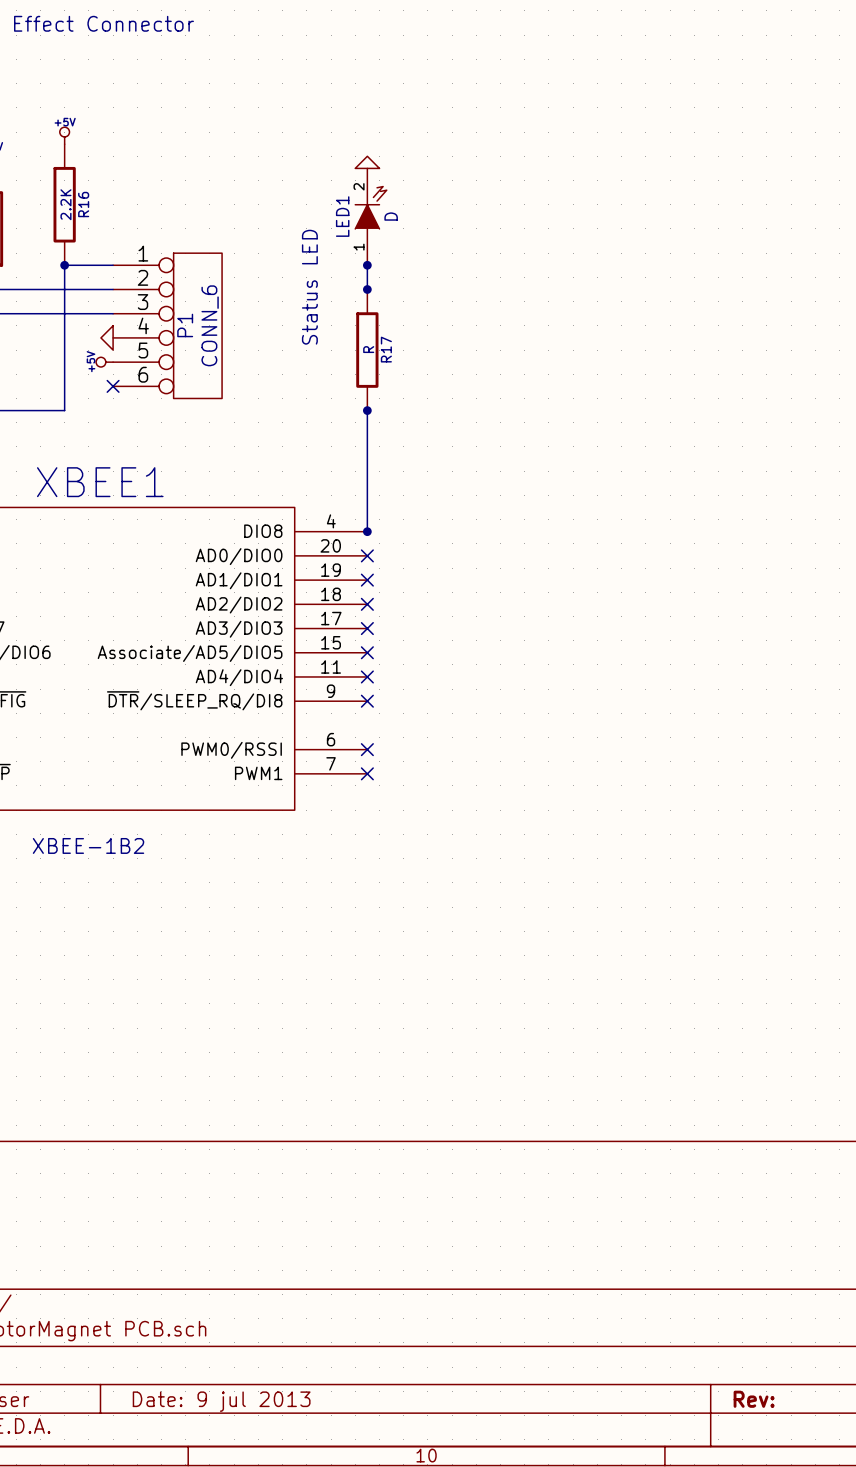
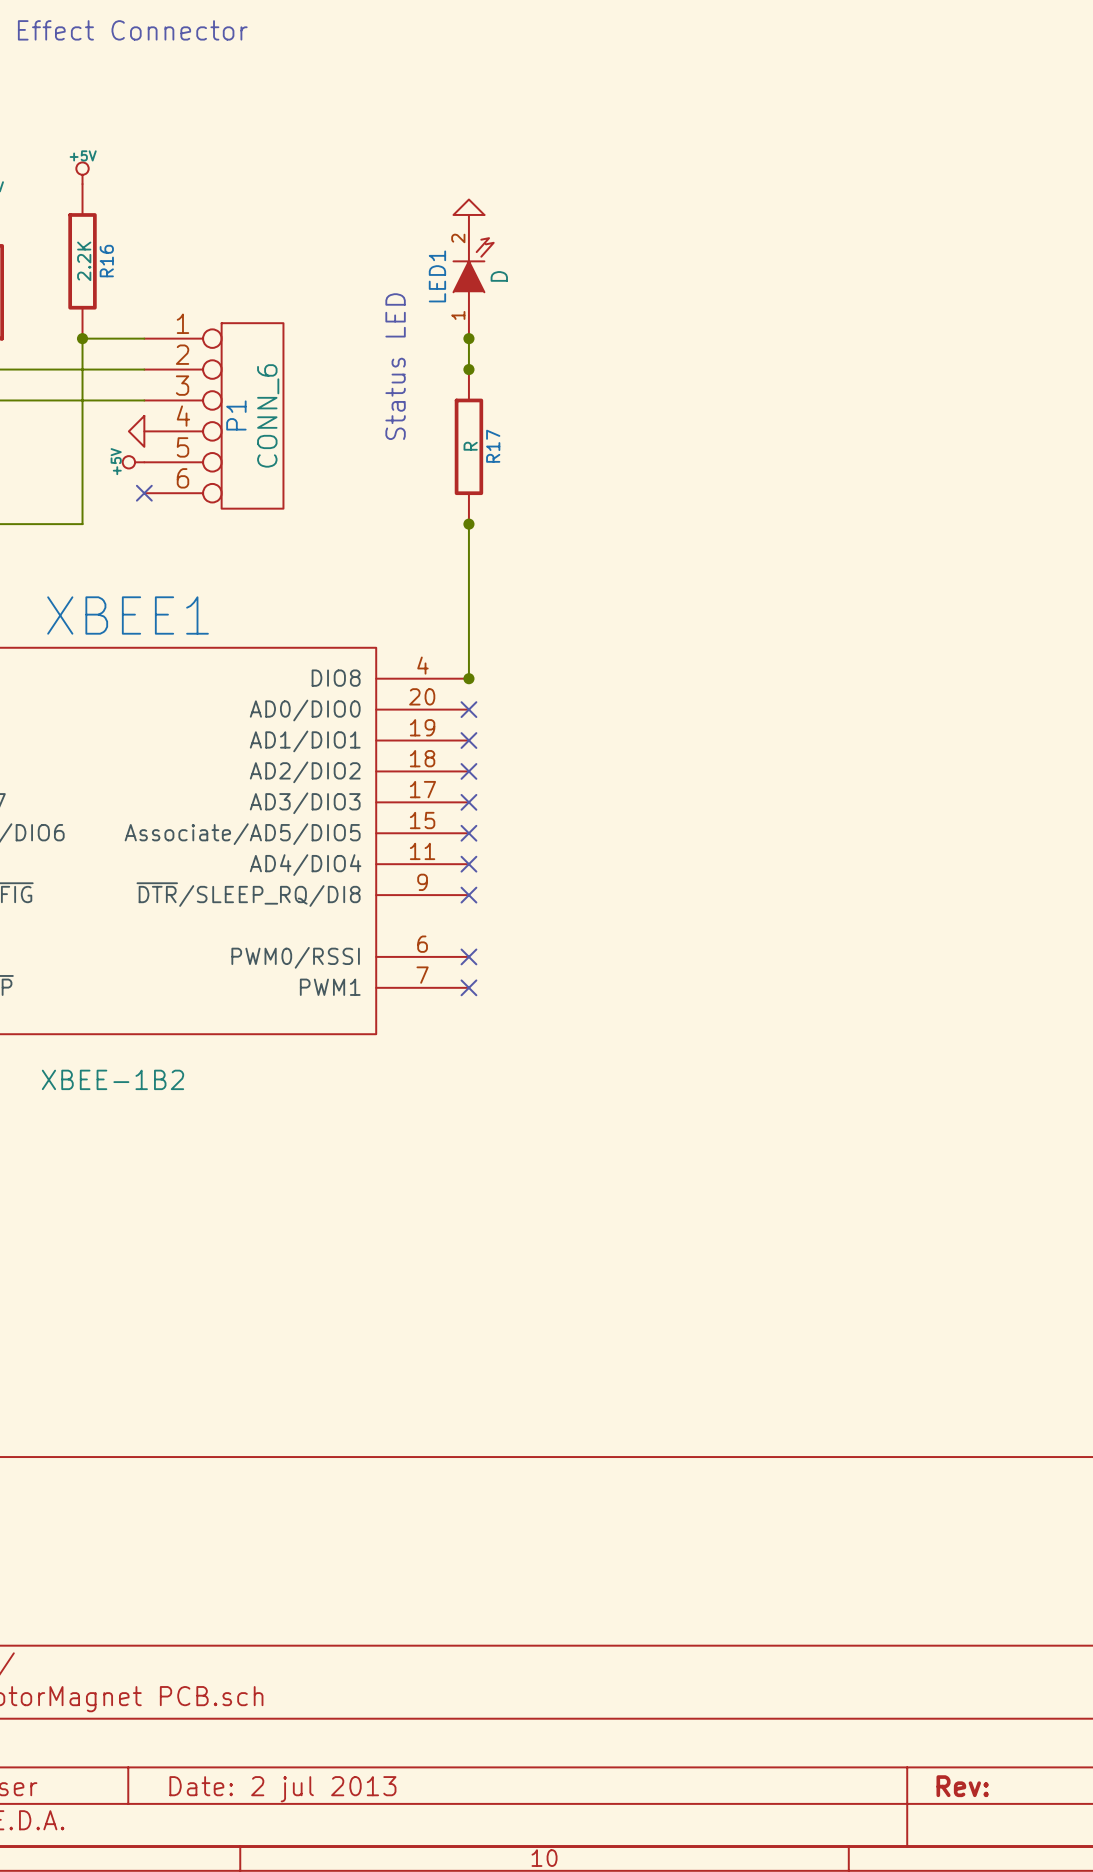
title block: Date: 9 jul 2013 (221, 1401) -> Date: 2 jul 2013 (282, 1789)

